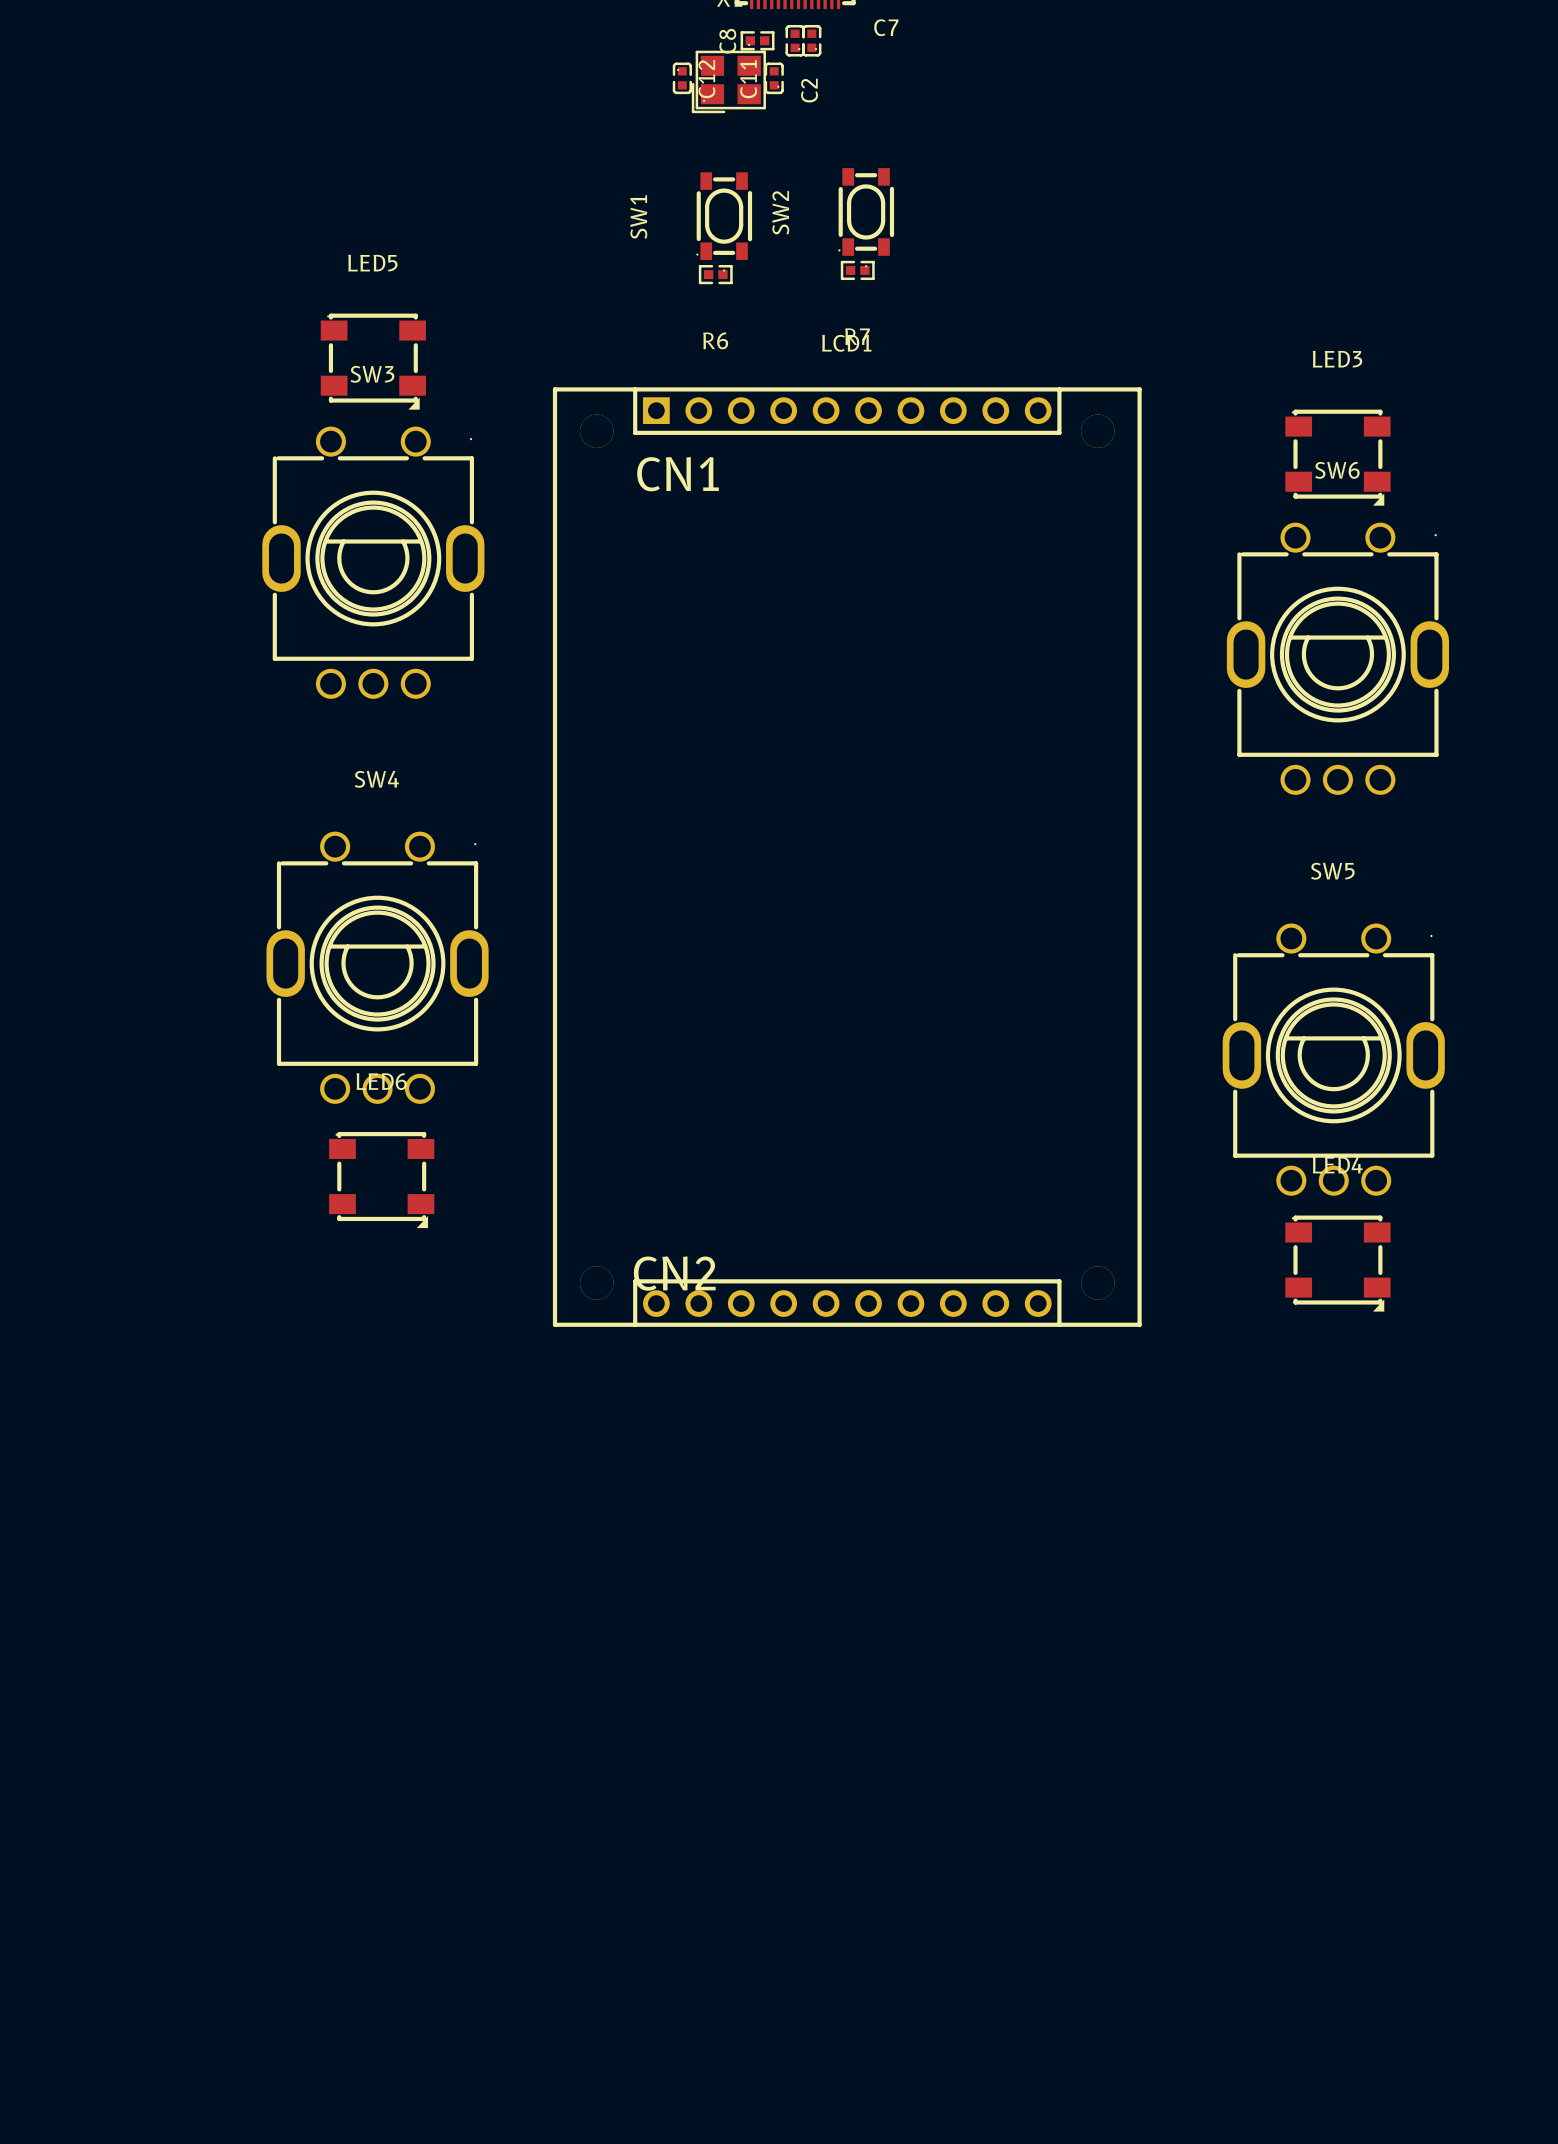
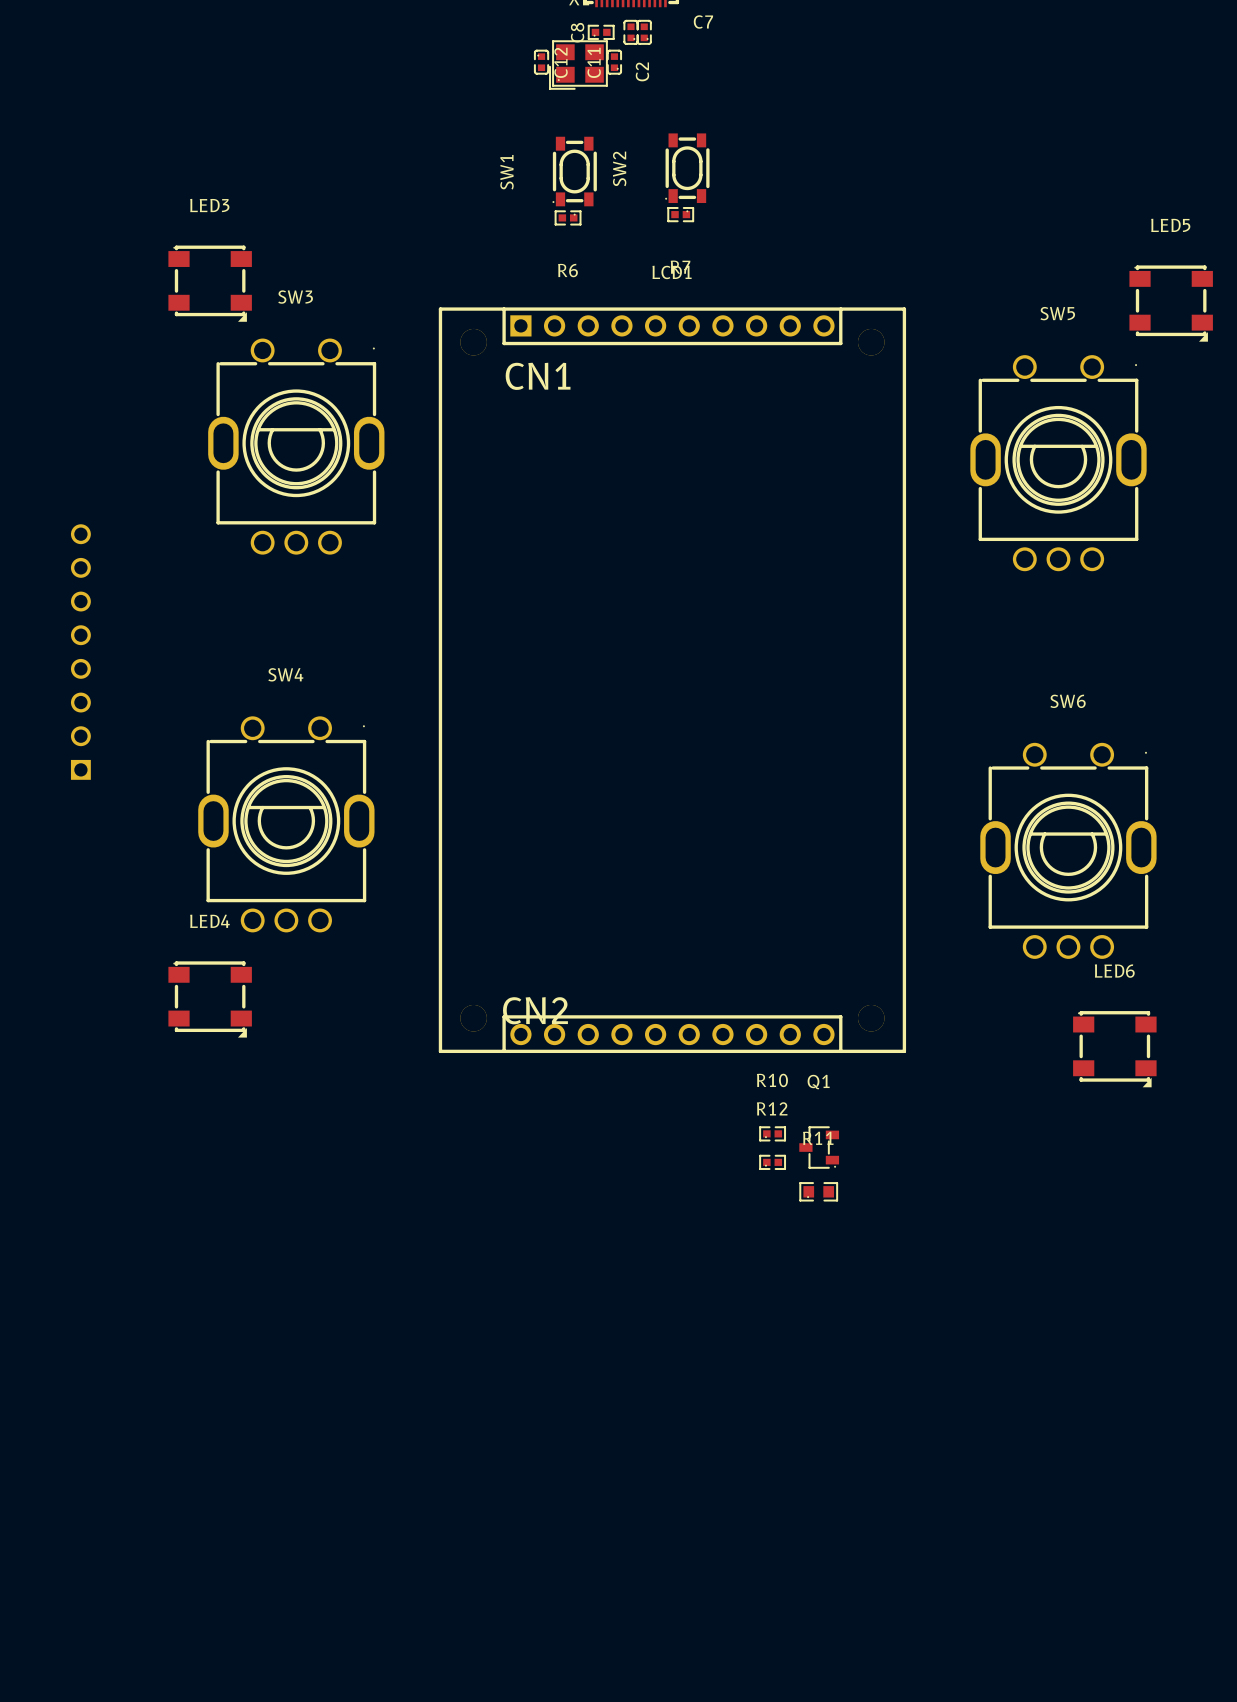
LED5 position: (373, 361) -> (1171, 303)
LED3 position: (1337, 457) -> (210, 283)
SW6 position: (1337, 658) -> (1068, 850)
part: none -> (80, 652)
SW4 position: (377, 967) -> (286, 824)
SW5 position: (1333, 1059) -> (1058, 463)
LED6 position: (381, 1180) -> (1114, 1049)
LED4 position: (1337, 1263) -> (210, 999)
R10: none -> (772, 1133)
Q1: none -> (819, 1147)
R12: none -> (772, 1162)
R11: none -> (818, 1191)

